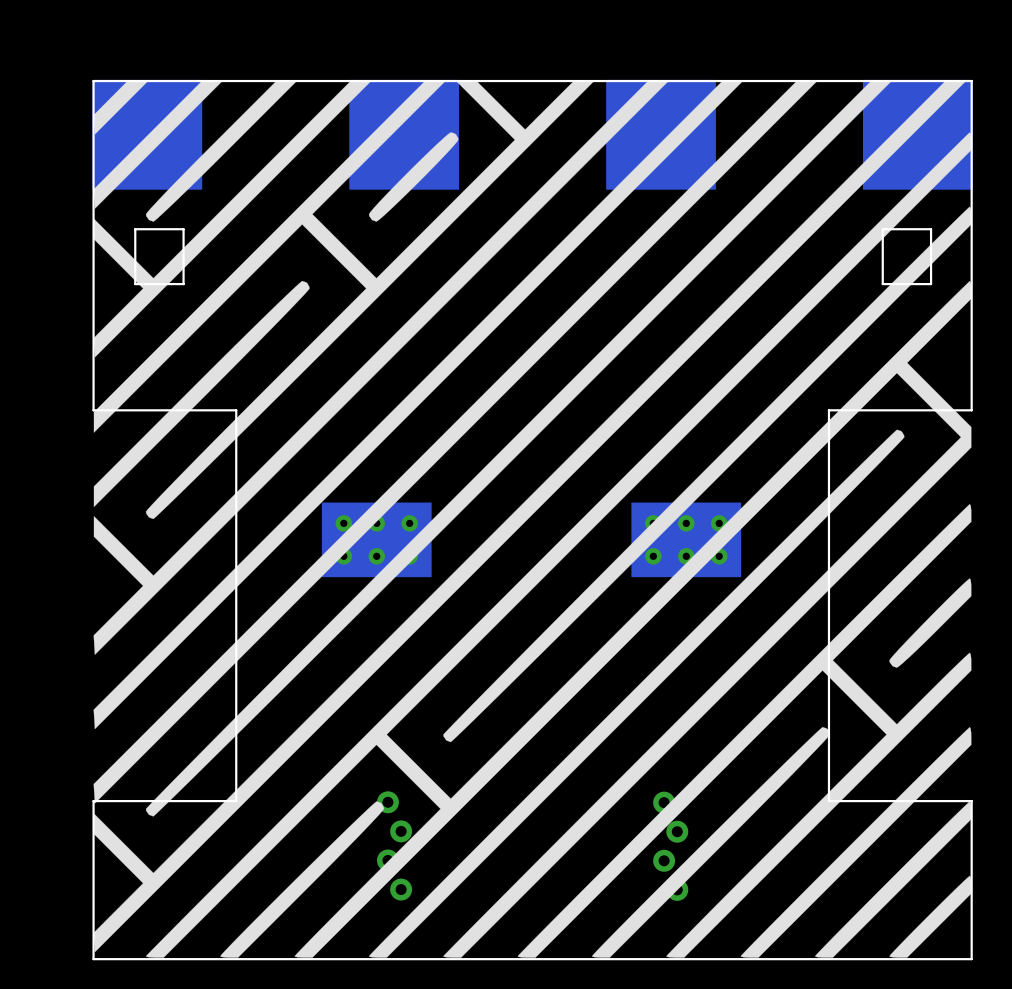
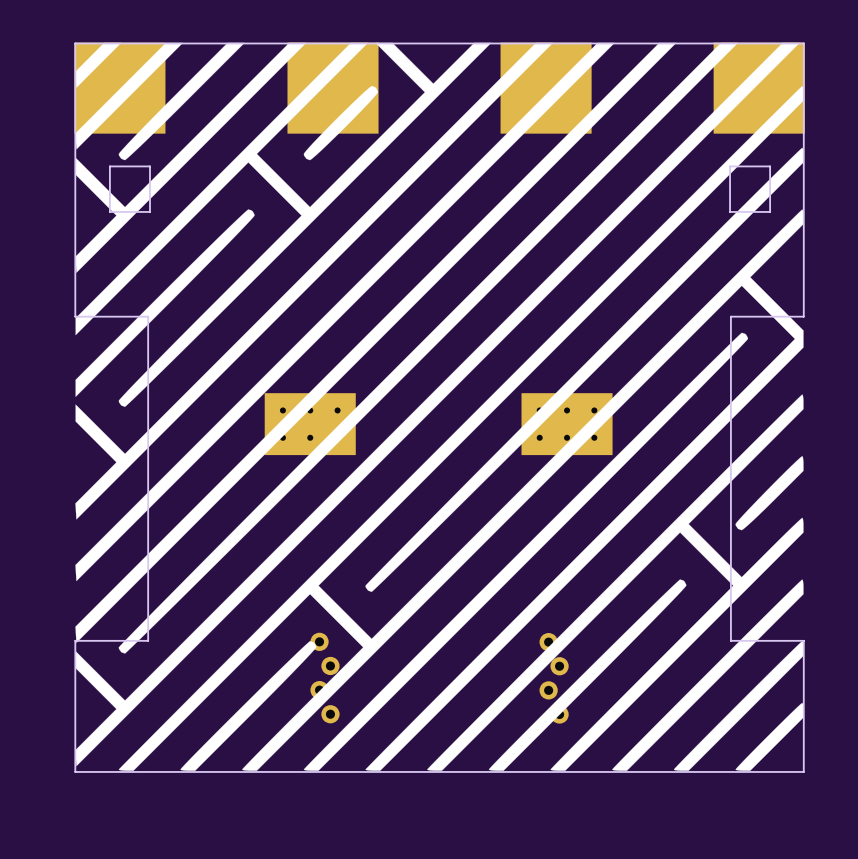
board edge: (181, 410) (236, 410) (236, 801) (181, 801) -> (148, 316) (148, 640)
board edge: (883, 410) (828, 410) (828, 801) (883, 801) -> (730, 316) (730, 640)

